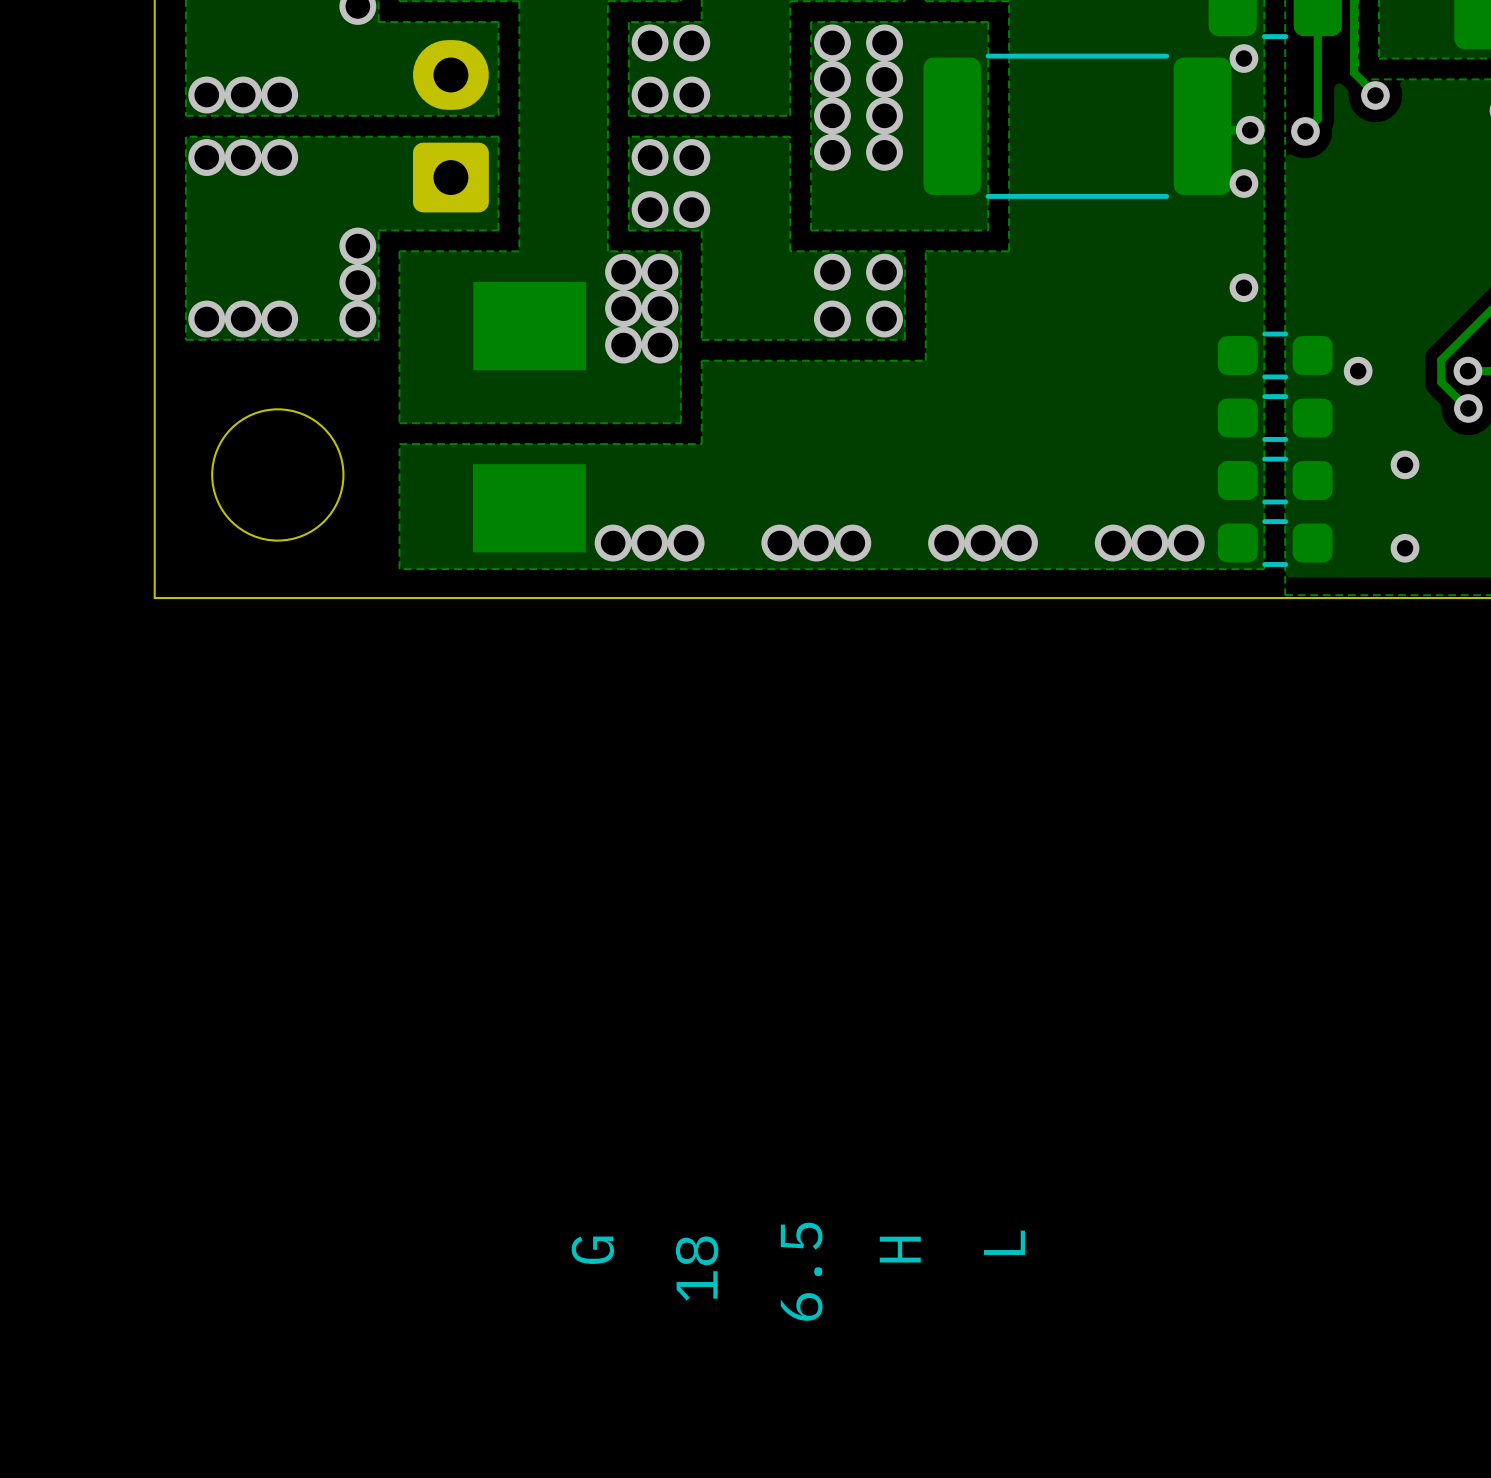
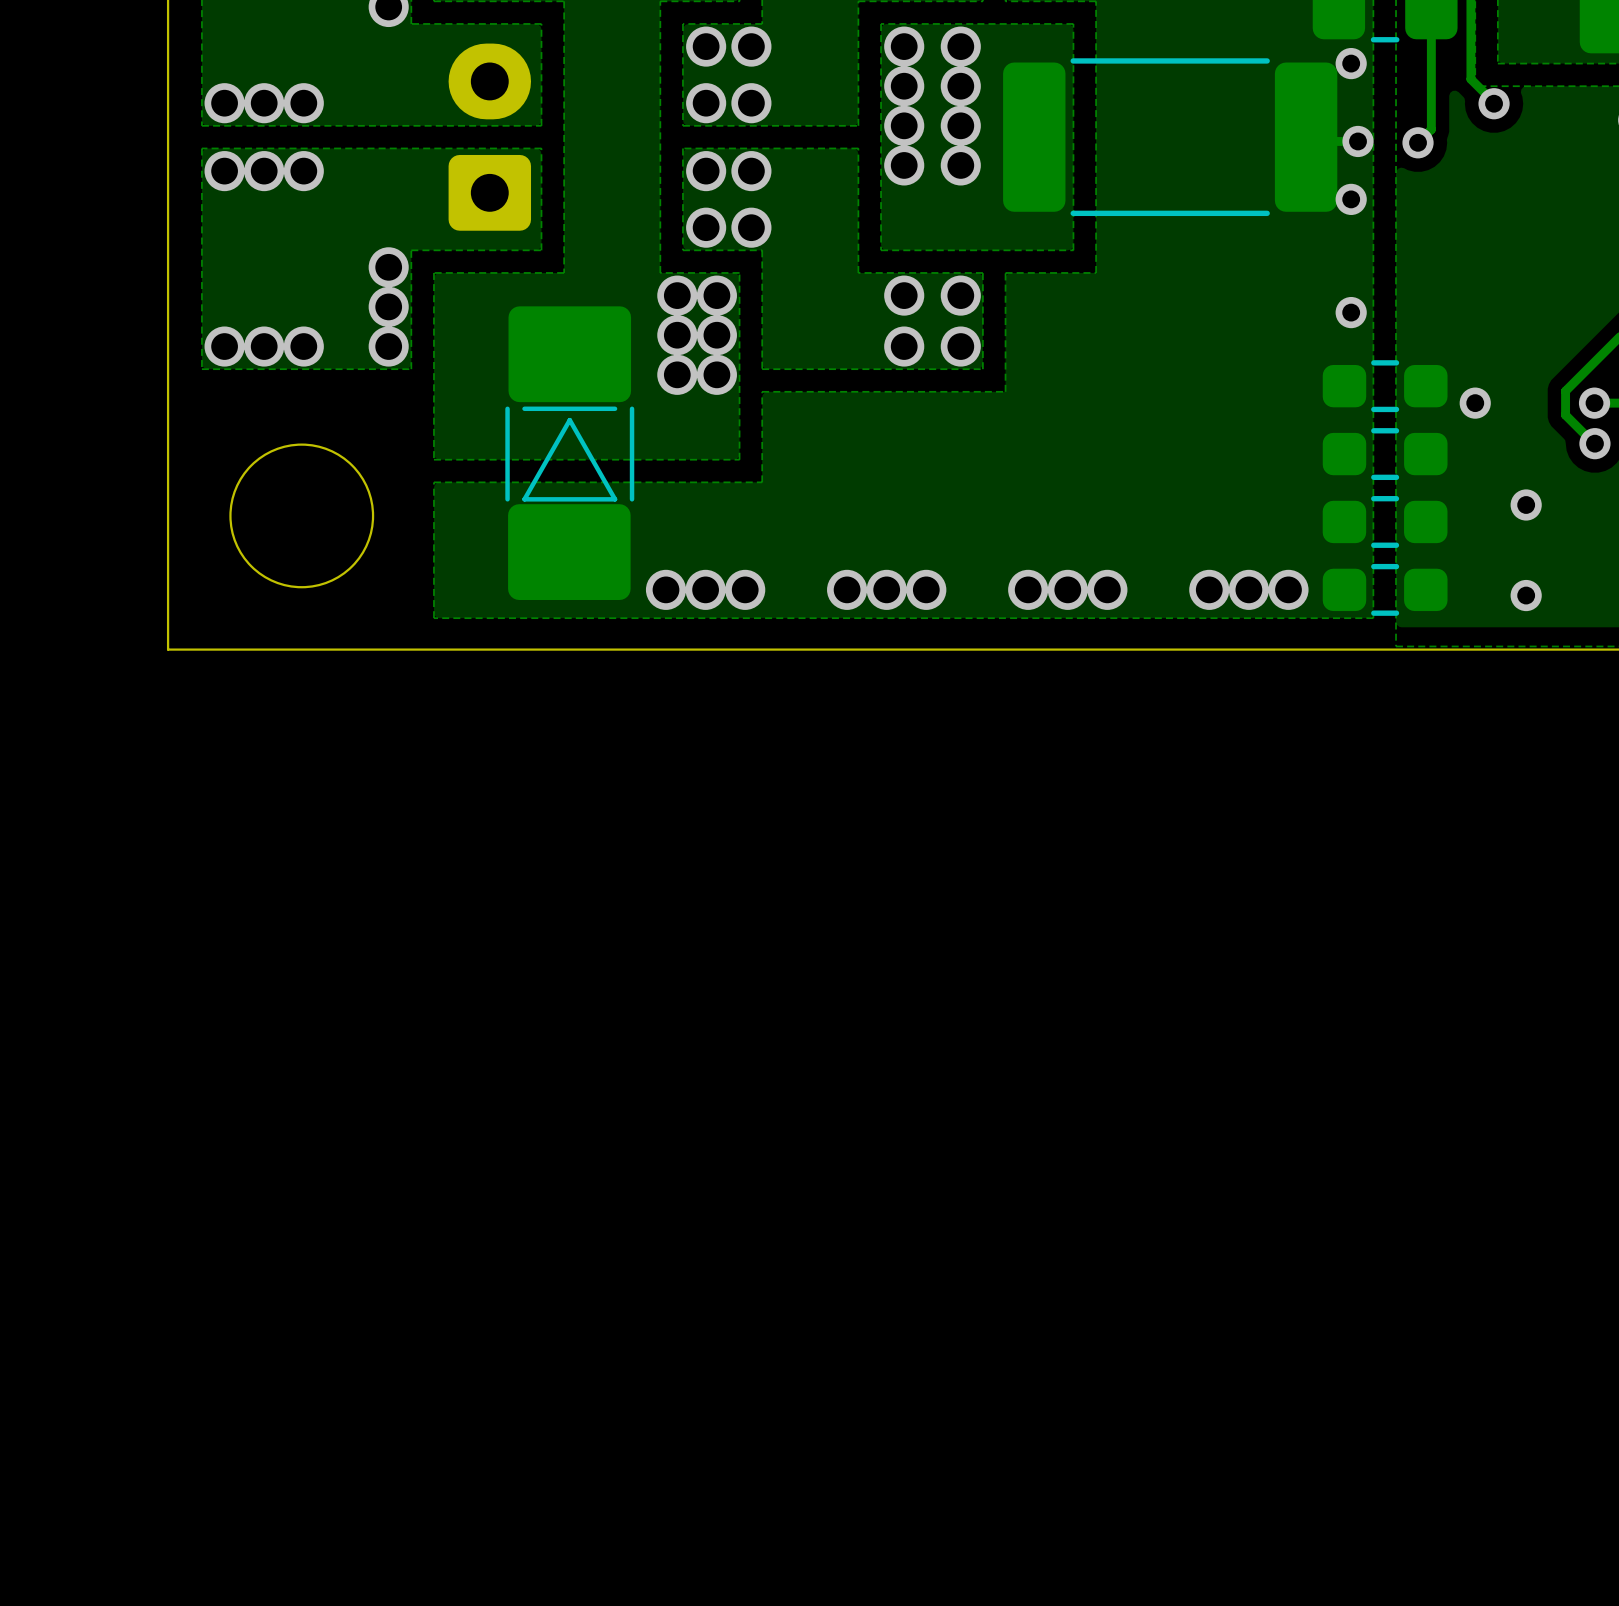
part footprint: [472, 282, 587, 553] -> [505, 306, 635, 600]
text: L (1004, 1242) -> none
text: H (900, 1249) -> none
text: G (592, 1250) -> none
text: 18 (697, 1268) -> none
text: 6.5 (801, 1271) -> none

